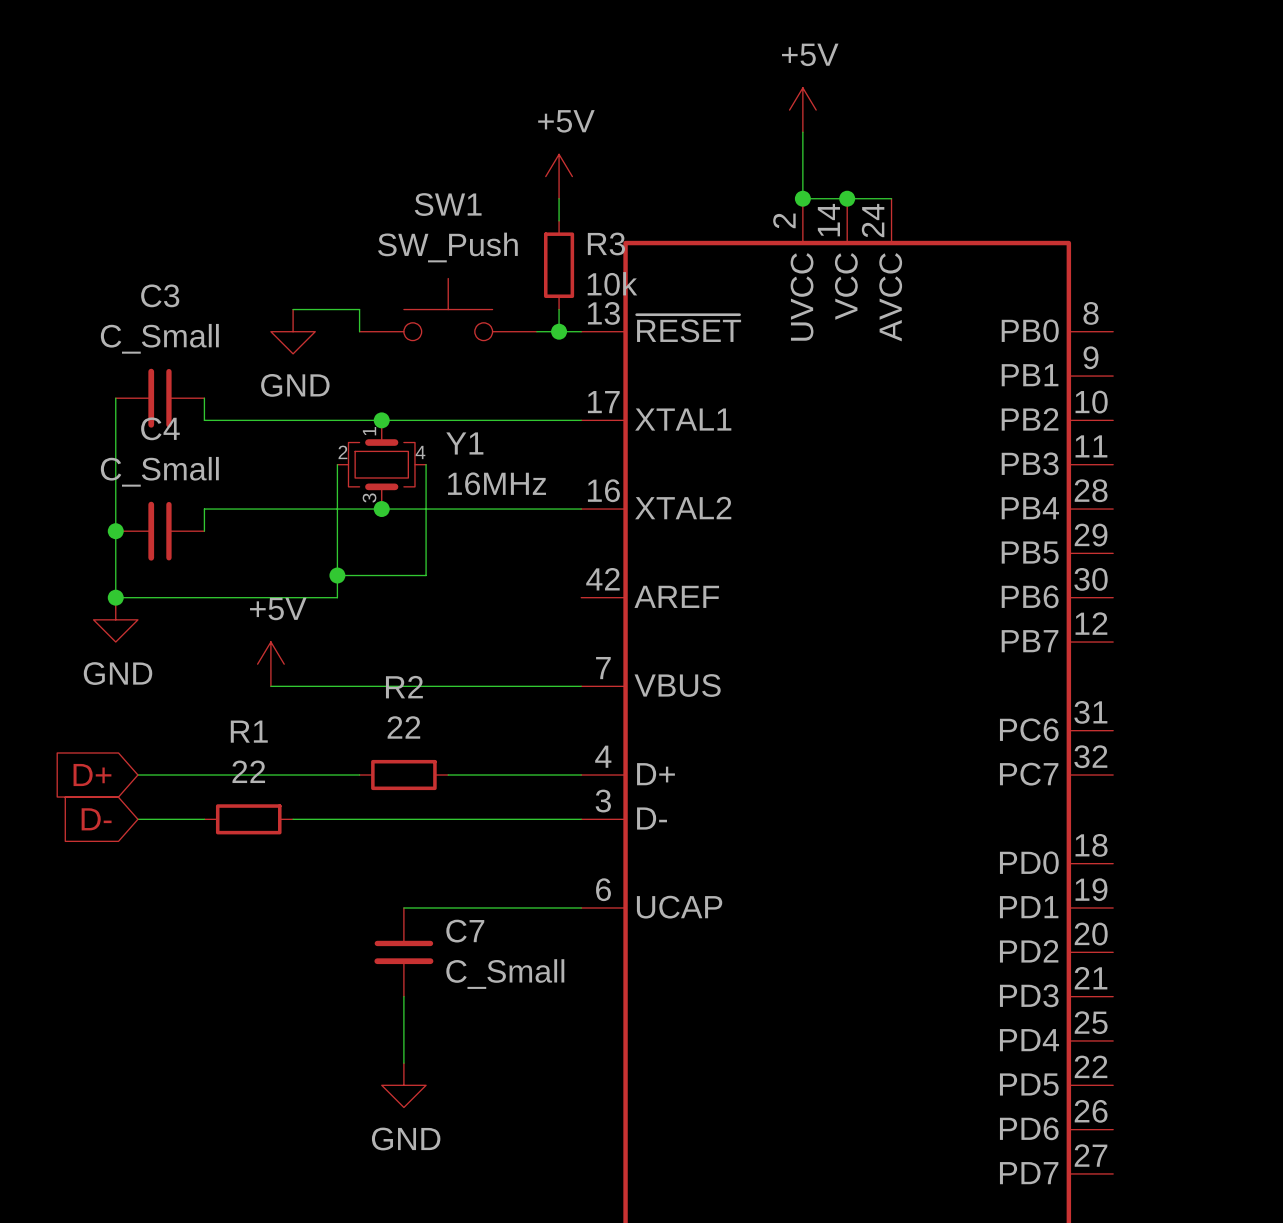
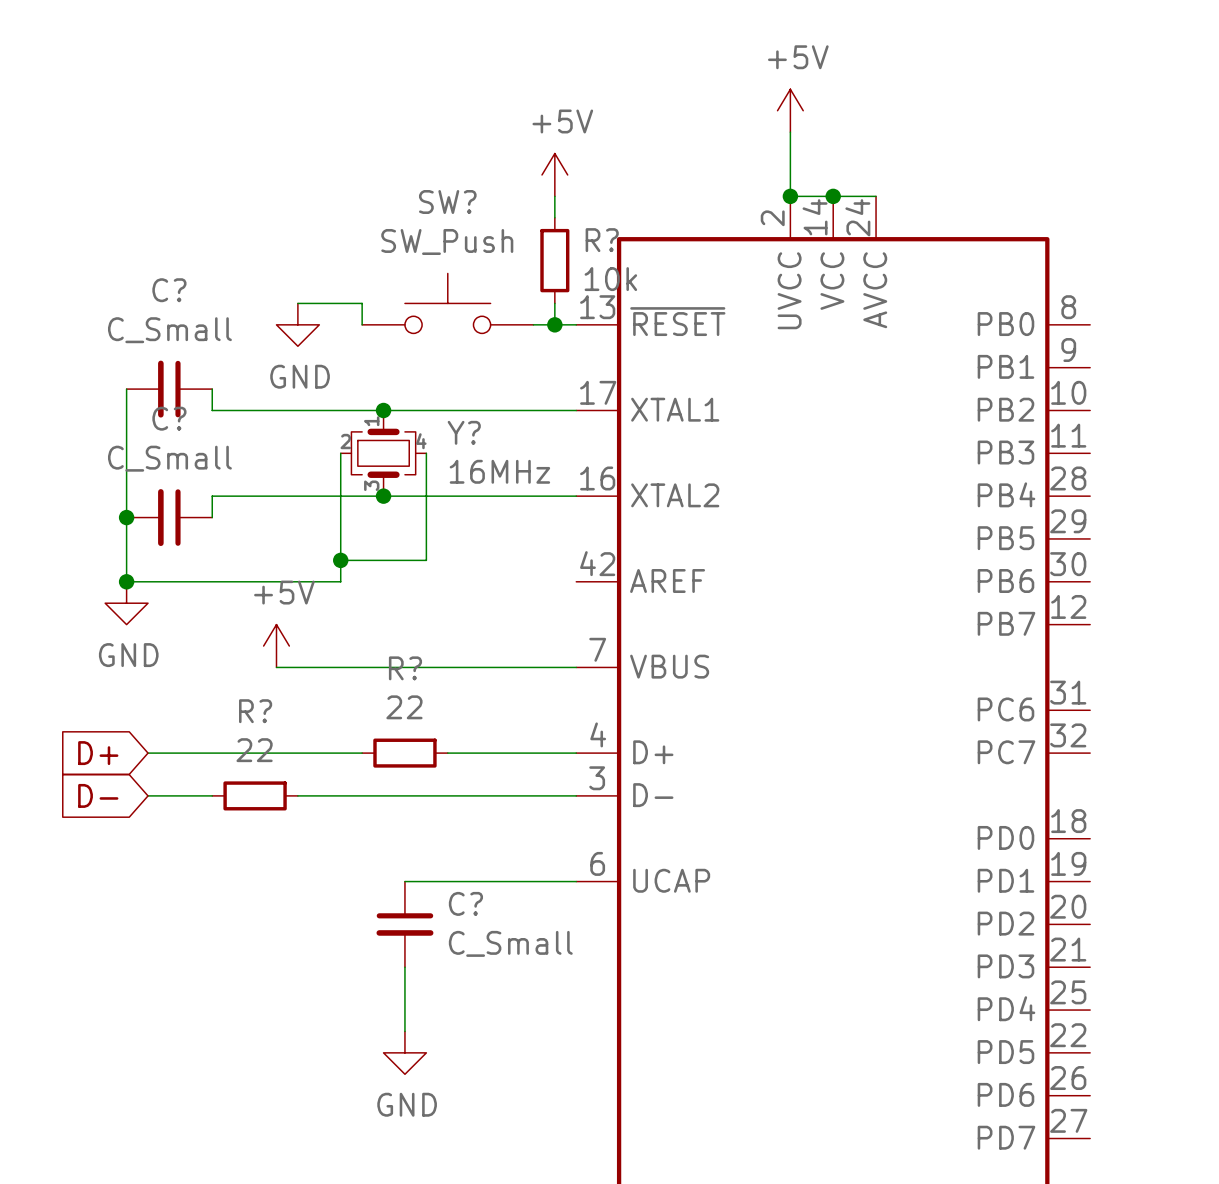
SW1 name: SW1 (448, 204) -> SW? (447, 202)
R3 name: R3 (606, 243) -> R? (602, 240)
C3 name: C3 (160, 295) -> C? (169, 290)
C4 name: C4 (160, 428) -> C? (169, 418)
Y1 name: Y1 (464, 443) -> Y? (464, 432)
R2 name: R2 (404, 687) -> R? (405, 668)
R1 name: R1 (249, 731) -> R? (255, 711)
C7 name: C7 (465, 931) -> C? (465, 903)

